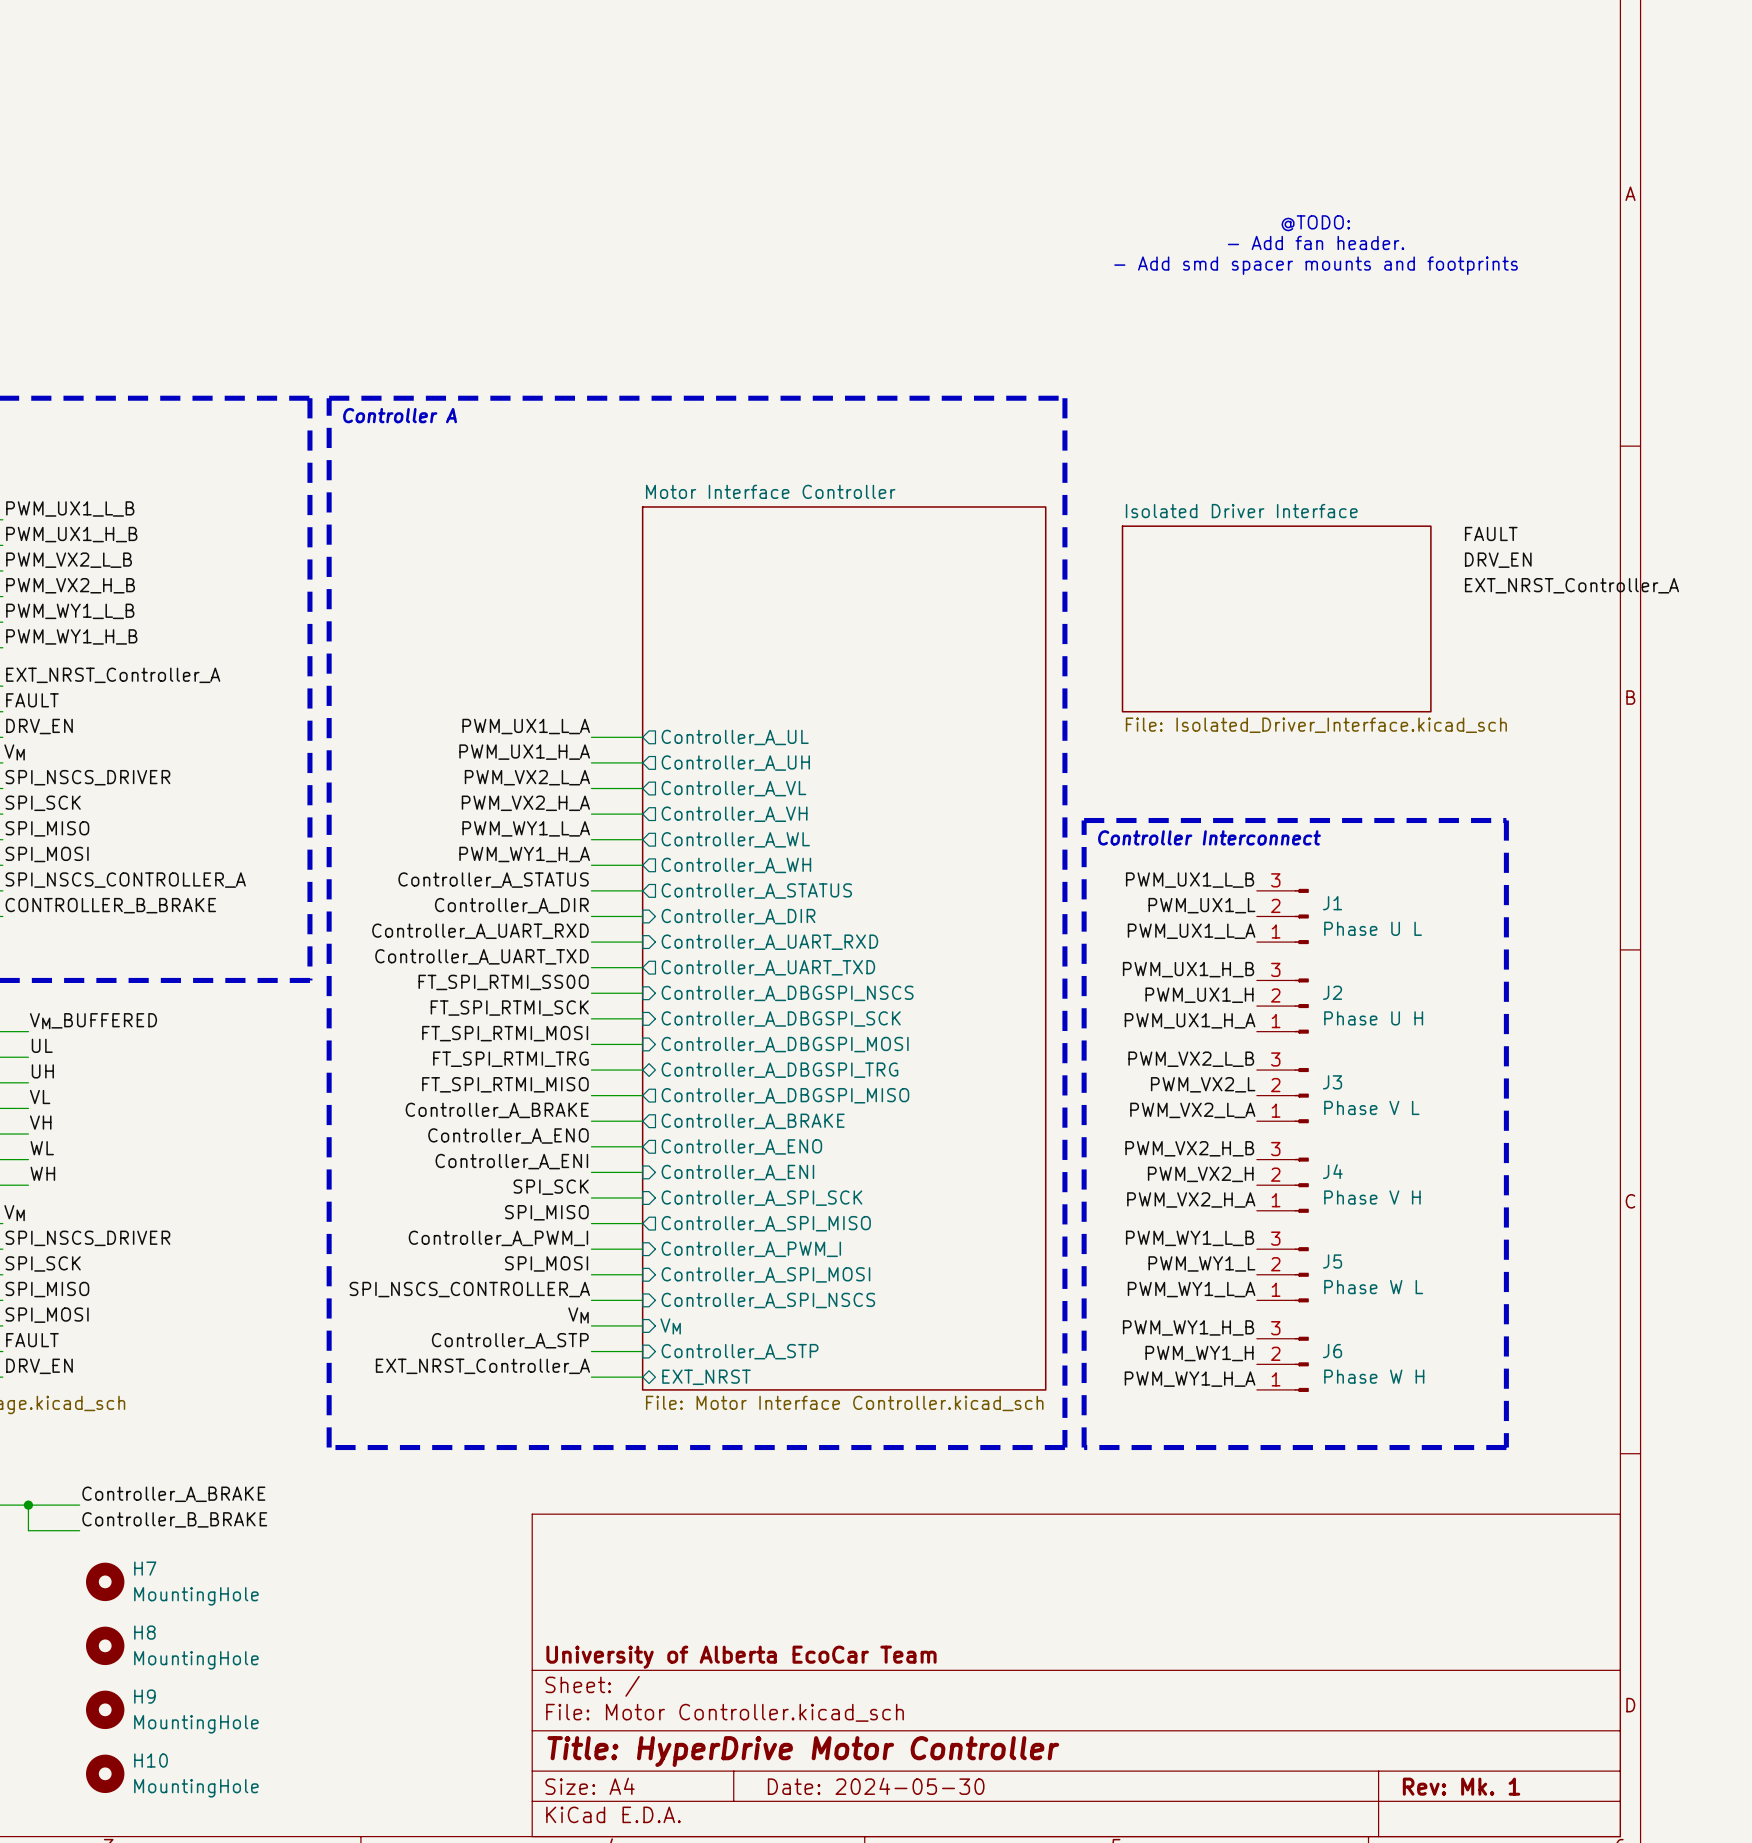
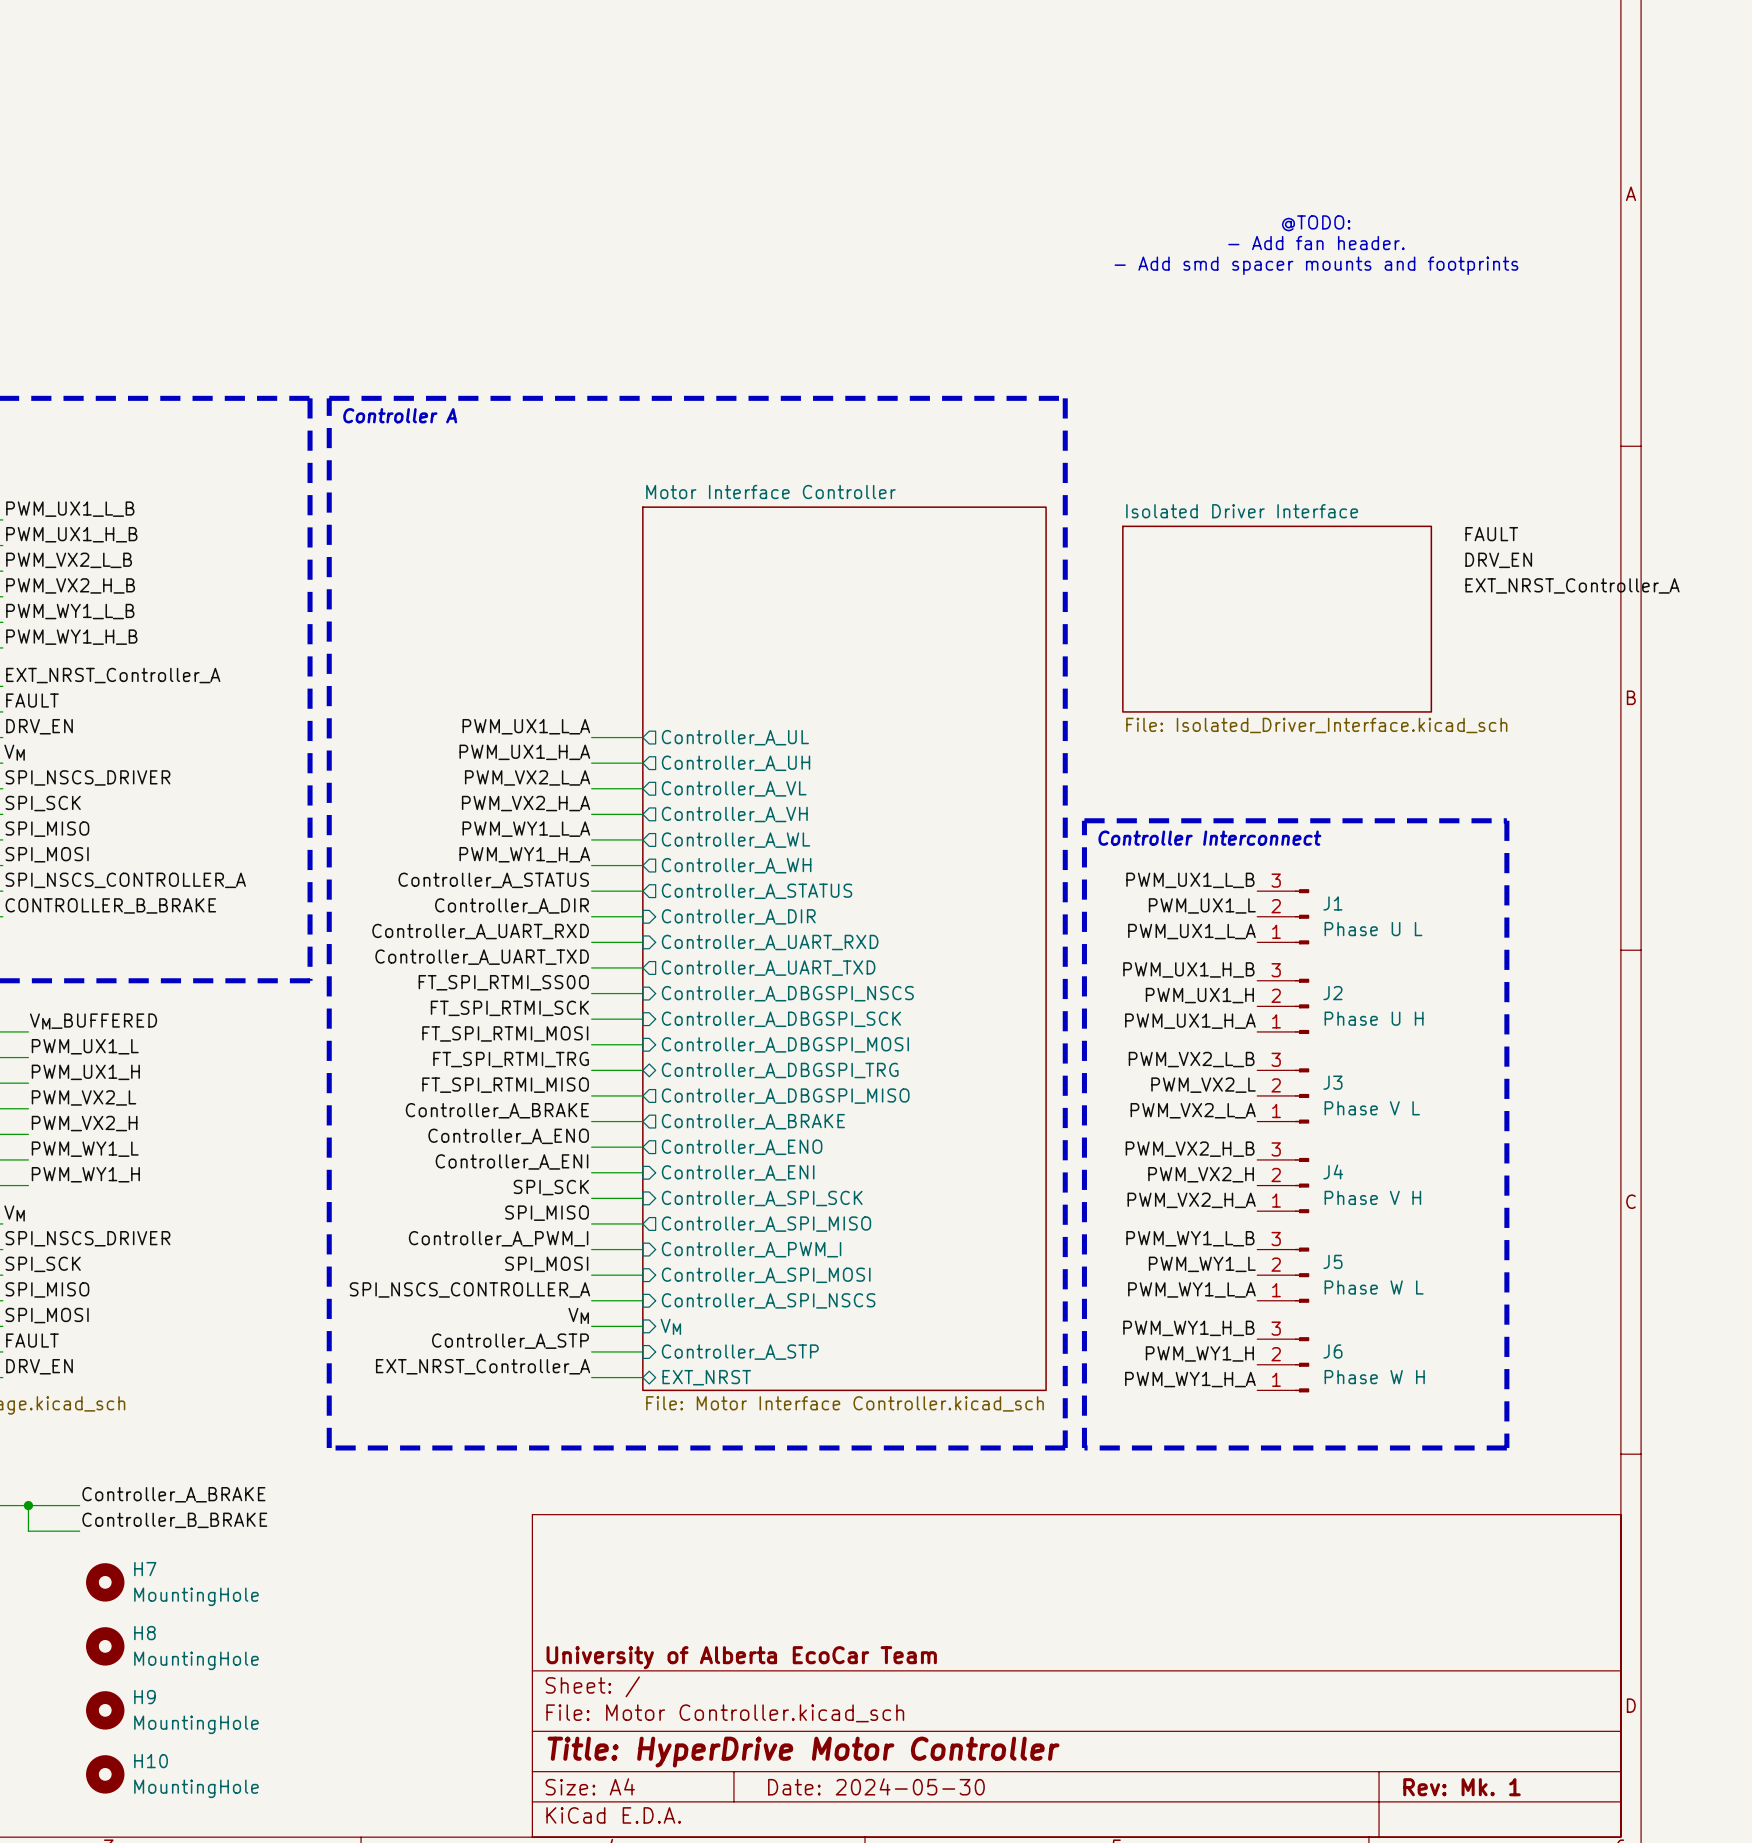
label: UL (42, 1045) -> PWM_UX1_L (85, 1046)
label: UH (42, 1071) -> PWM_UX1_H (85, 1072)
label: VL (40, 1097) -> PWM_VX2_L (84, 1097)
label: VH (40, 1122) -> PWM_VX2_H (84, 1123)
label: WL (42, 1148) -> PWM_WY1_L (85, 1149)
label: WH (42, 1173) -> PWM_WY1_H (85, 1174)

